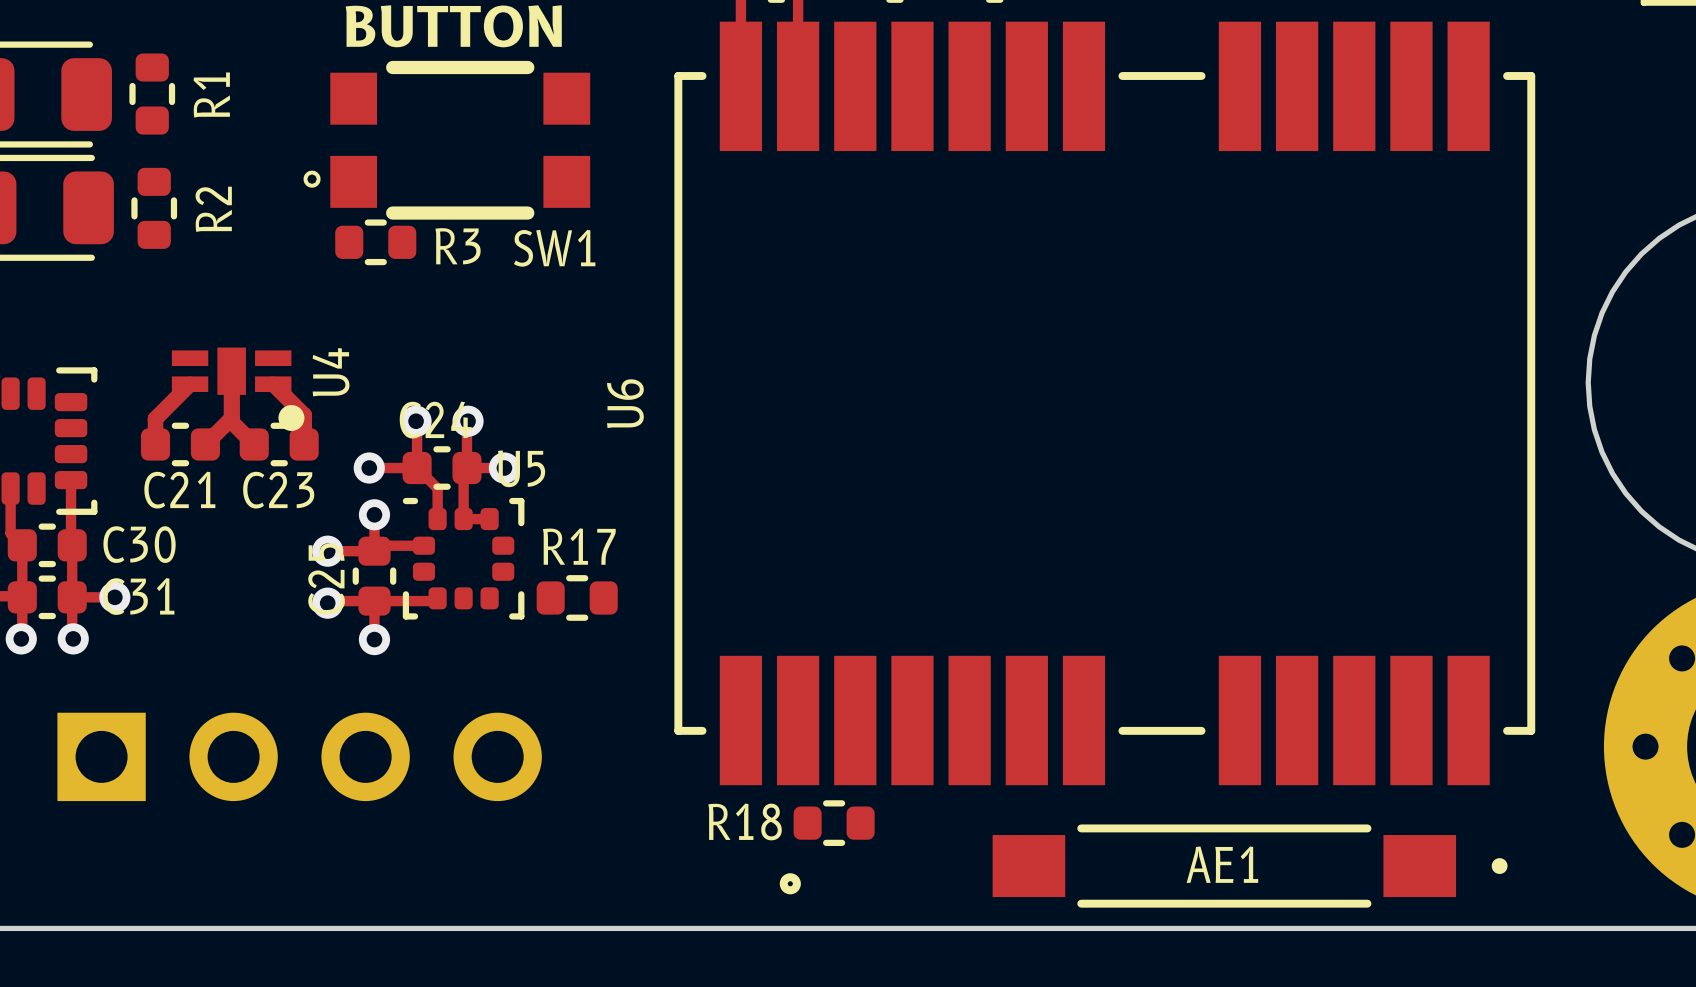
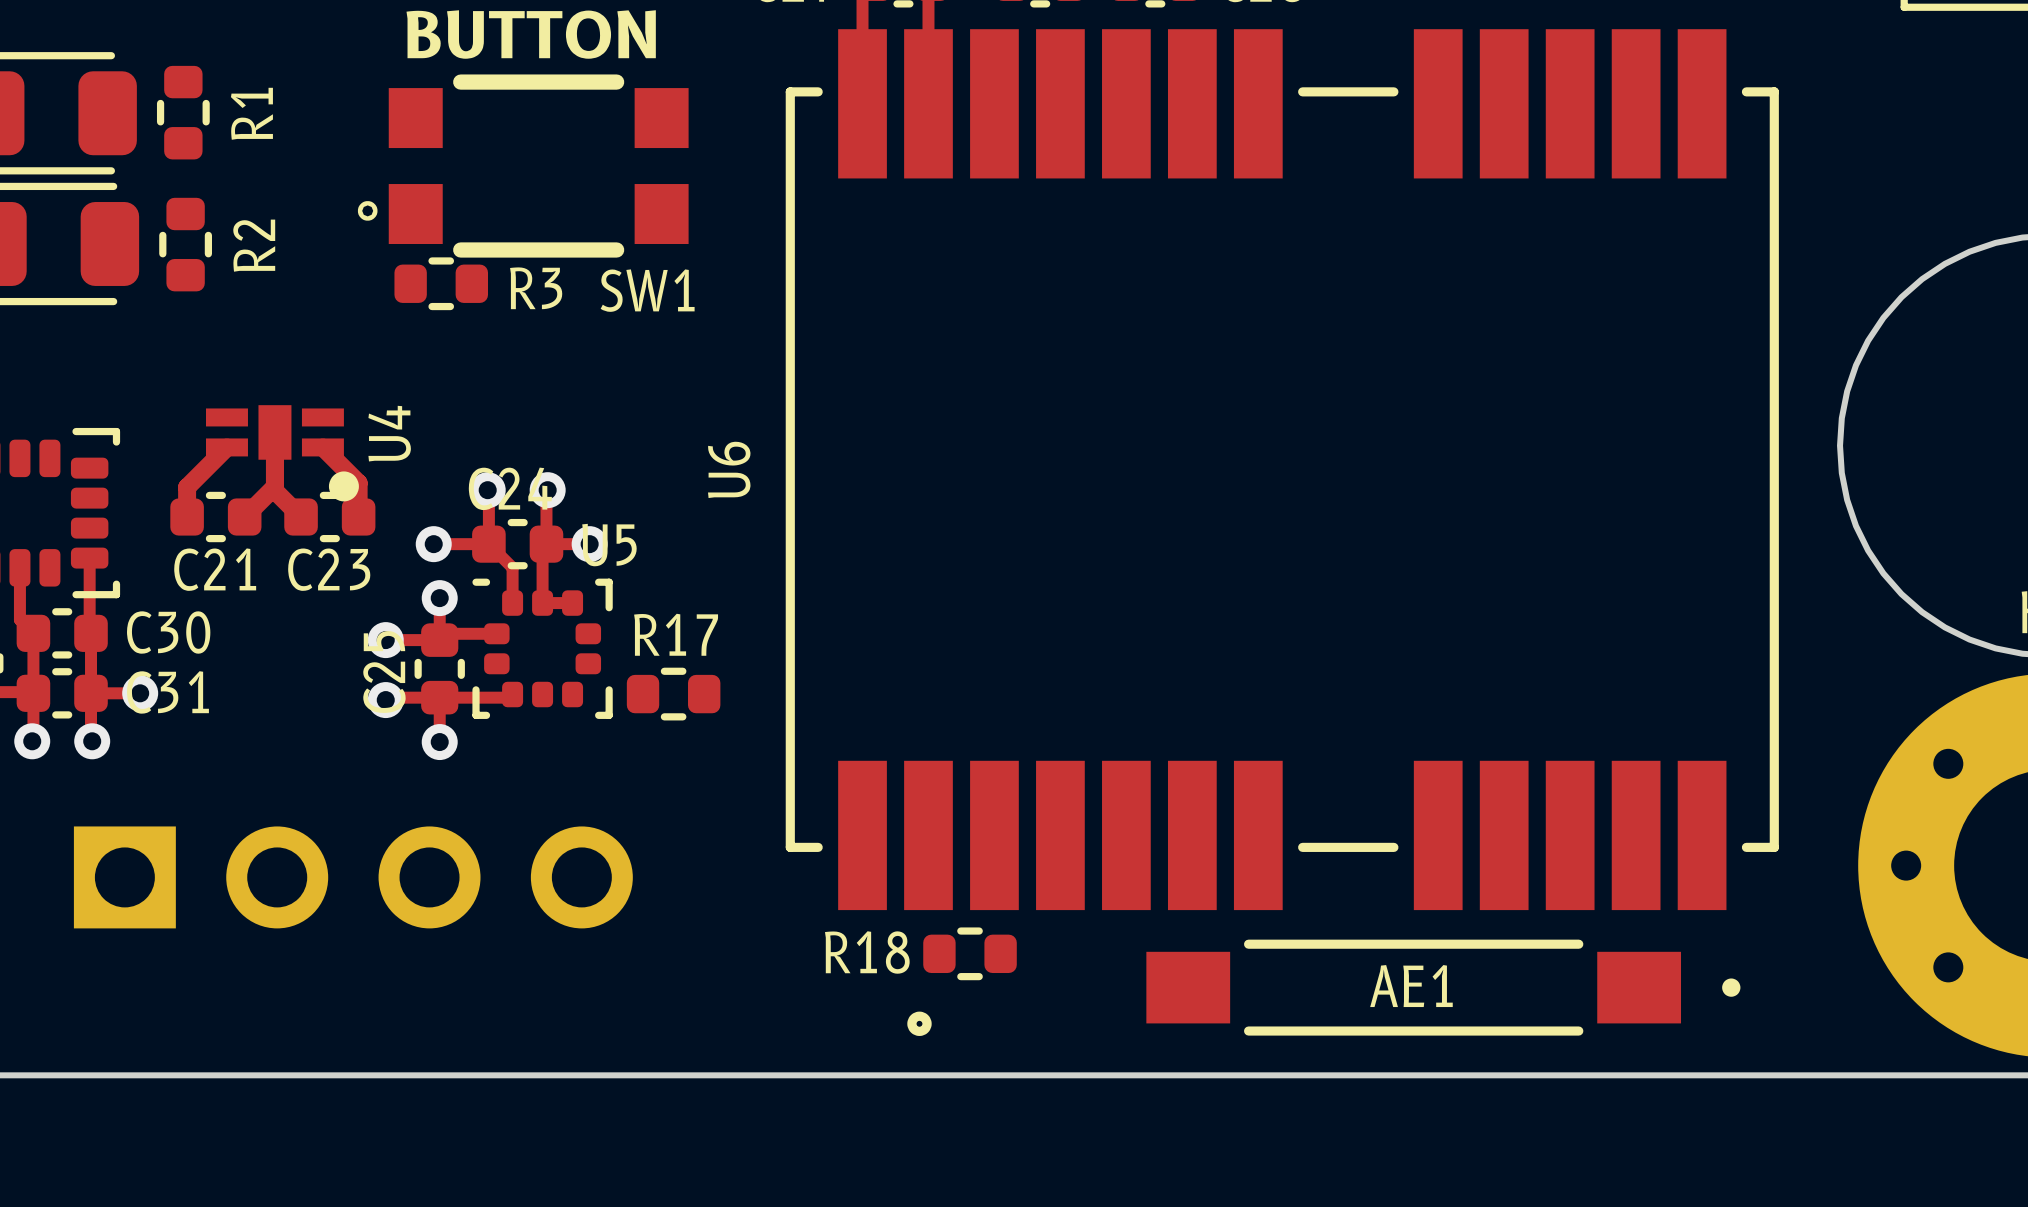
AE1 position: (1250, 866) -> (1443, 987)

